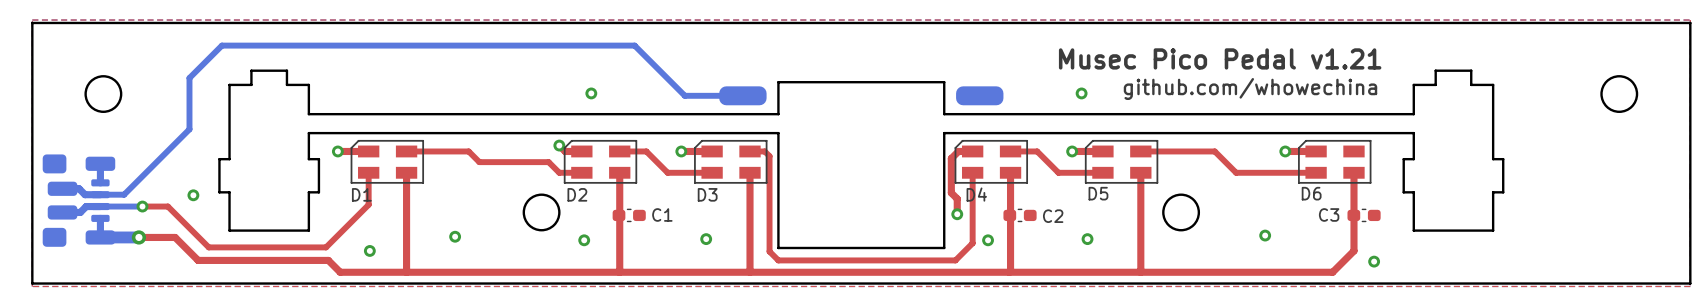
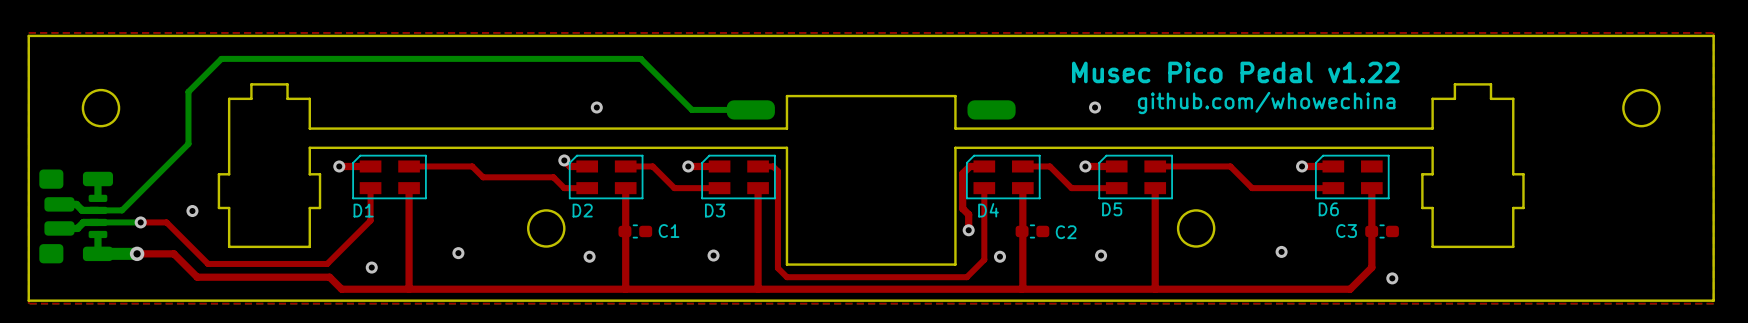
text: Musec Pico Pedal v1.21 (1220, 58) -> Musec Pico Pedal v1.22 (1235, 72)

